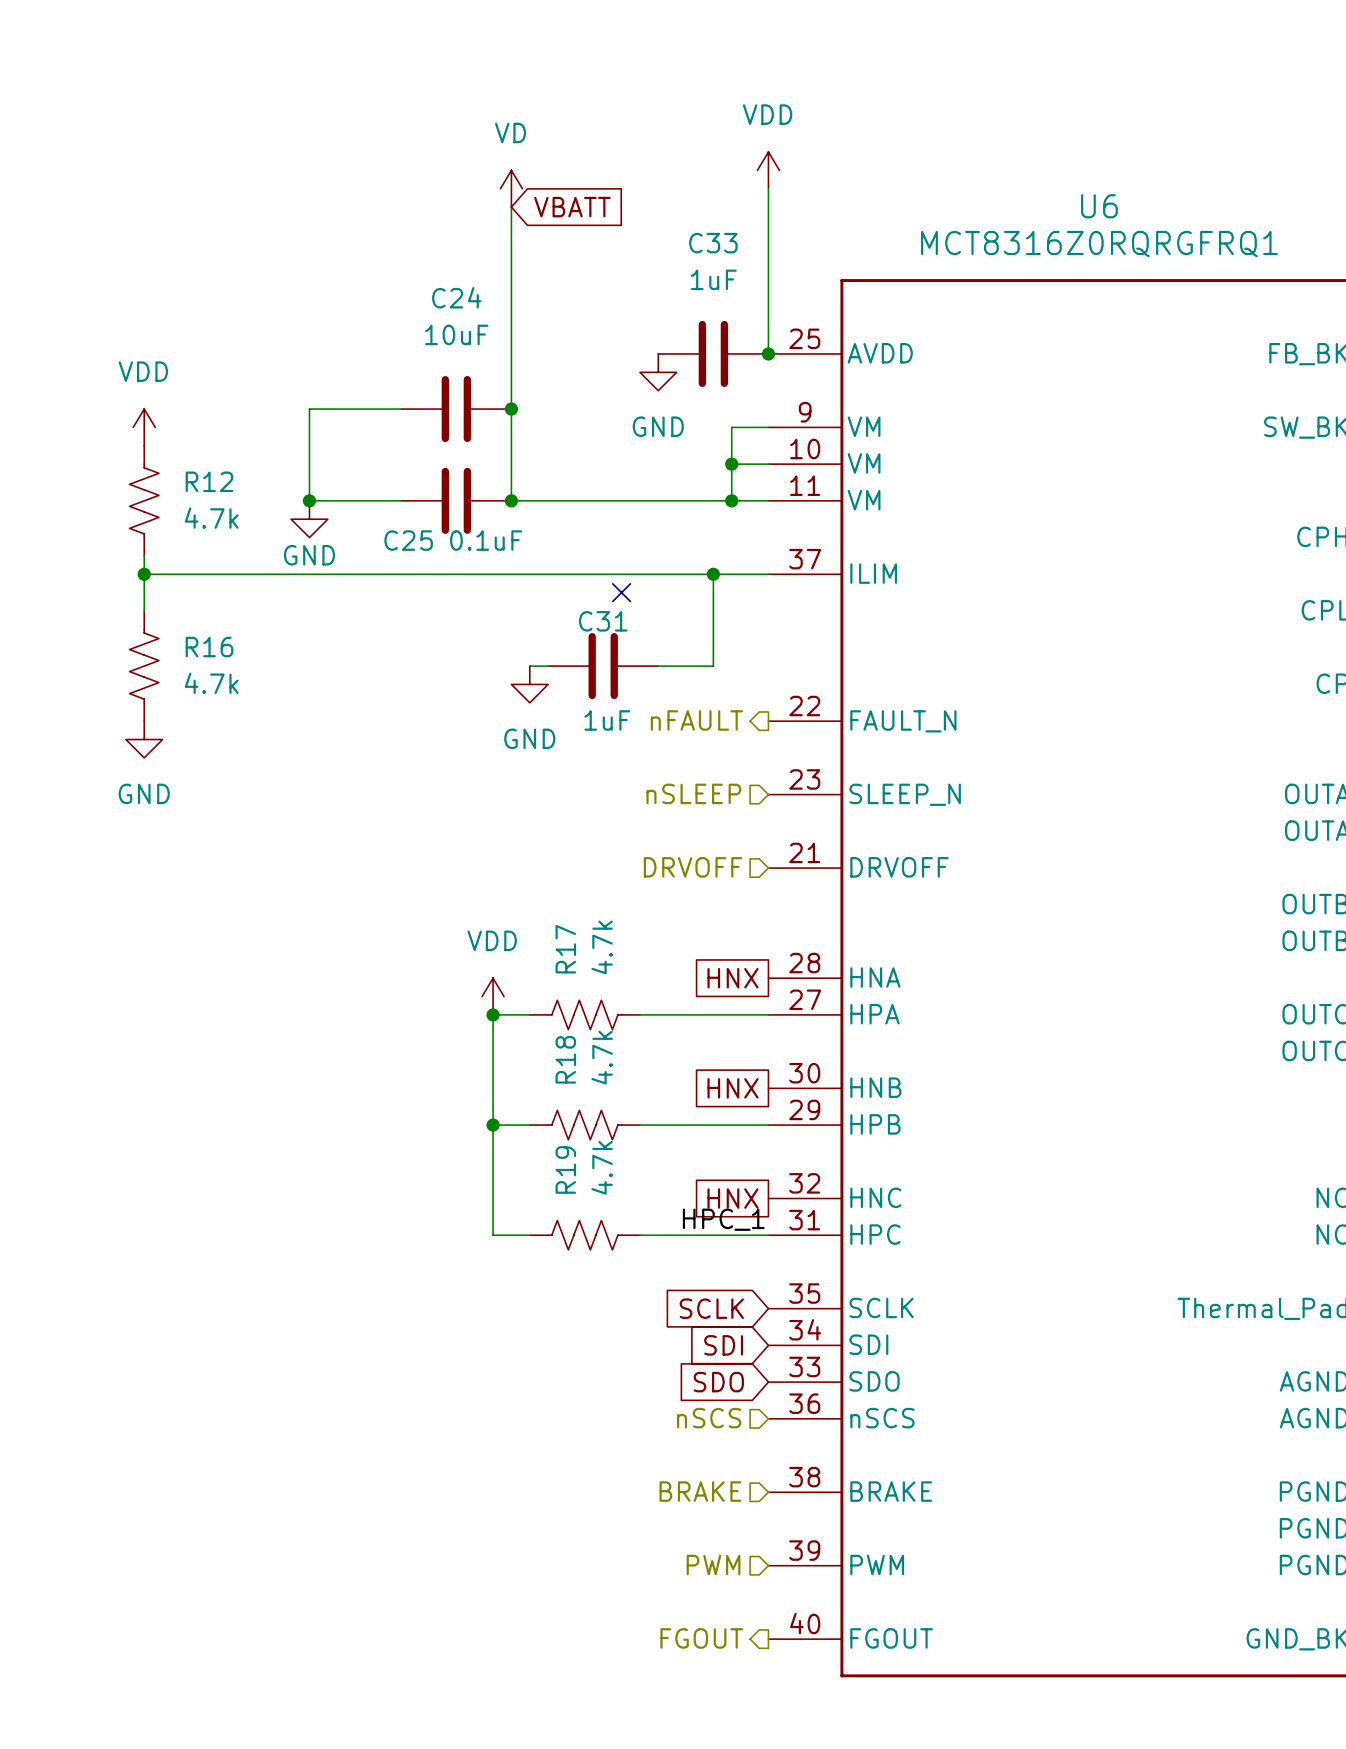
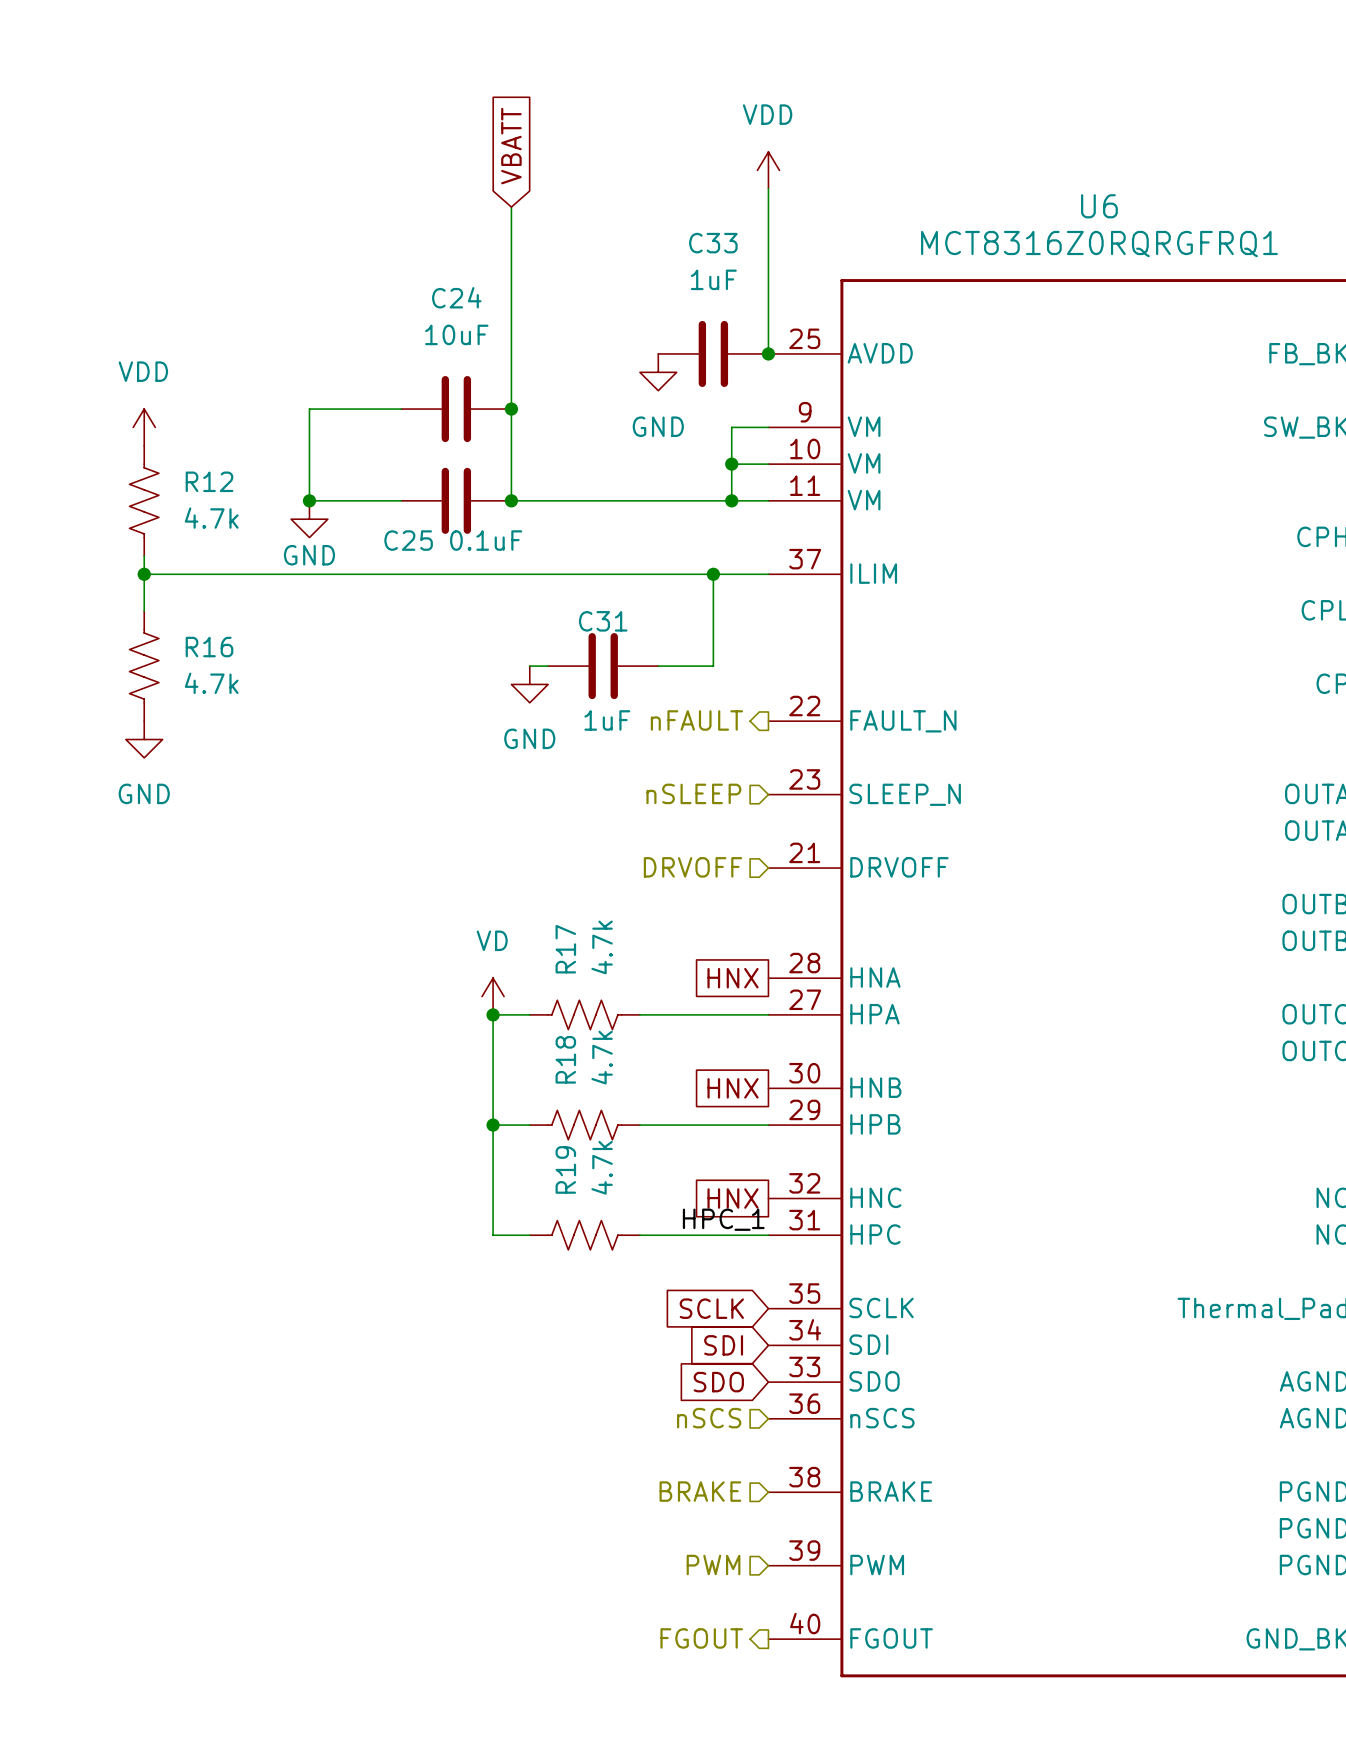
power symbol: VD (511, 188) -> none
global label rotation: 0° (572, 207) -> 90° counterclockwise (511, 146)
no-connect mark: (621, 592) -> none
power symbol: VDD (493, 996) -> VD (493, 996)

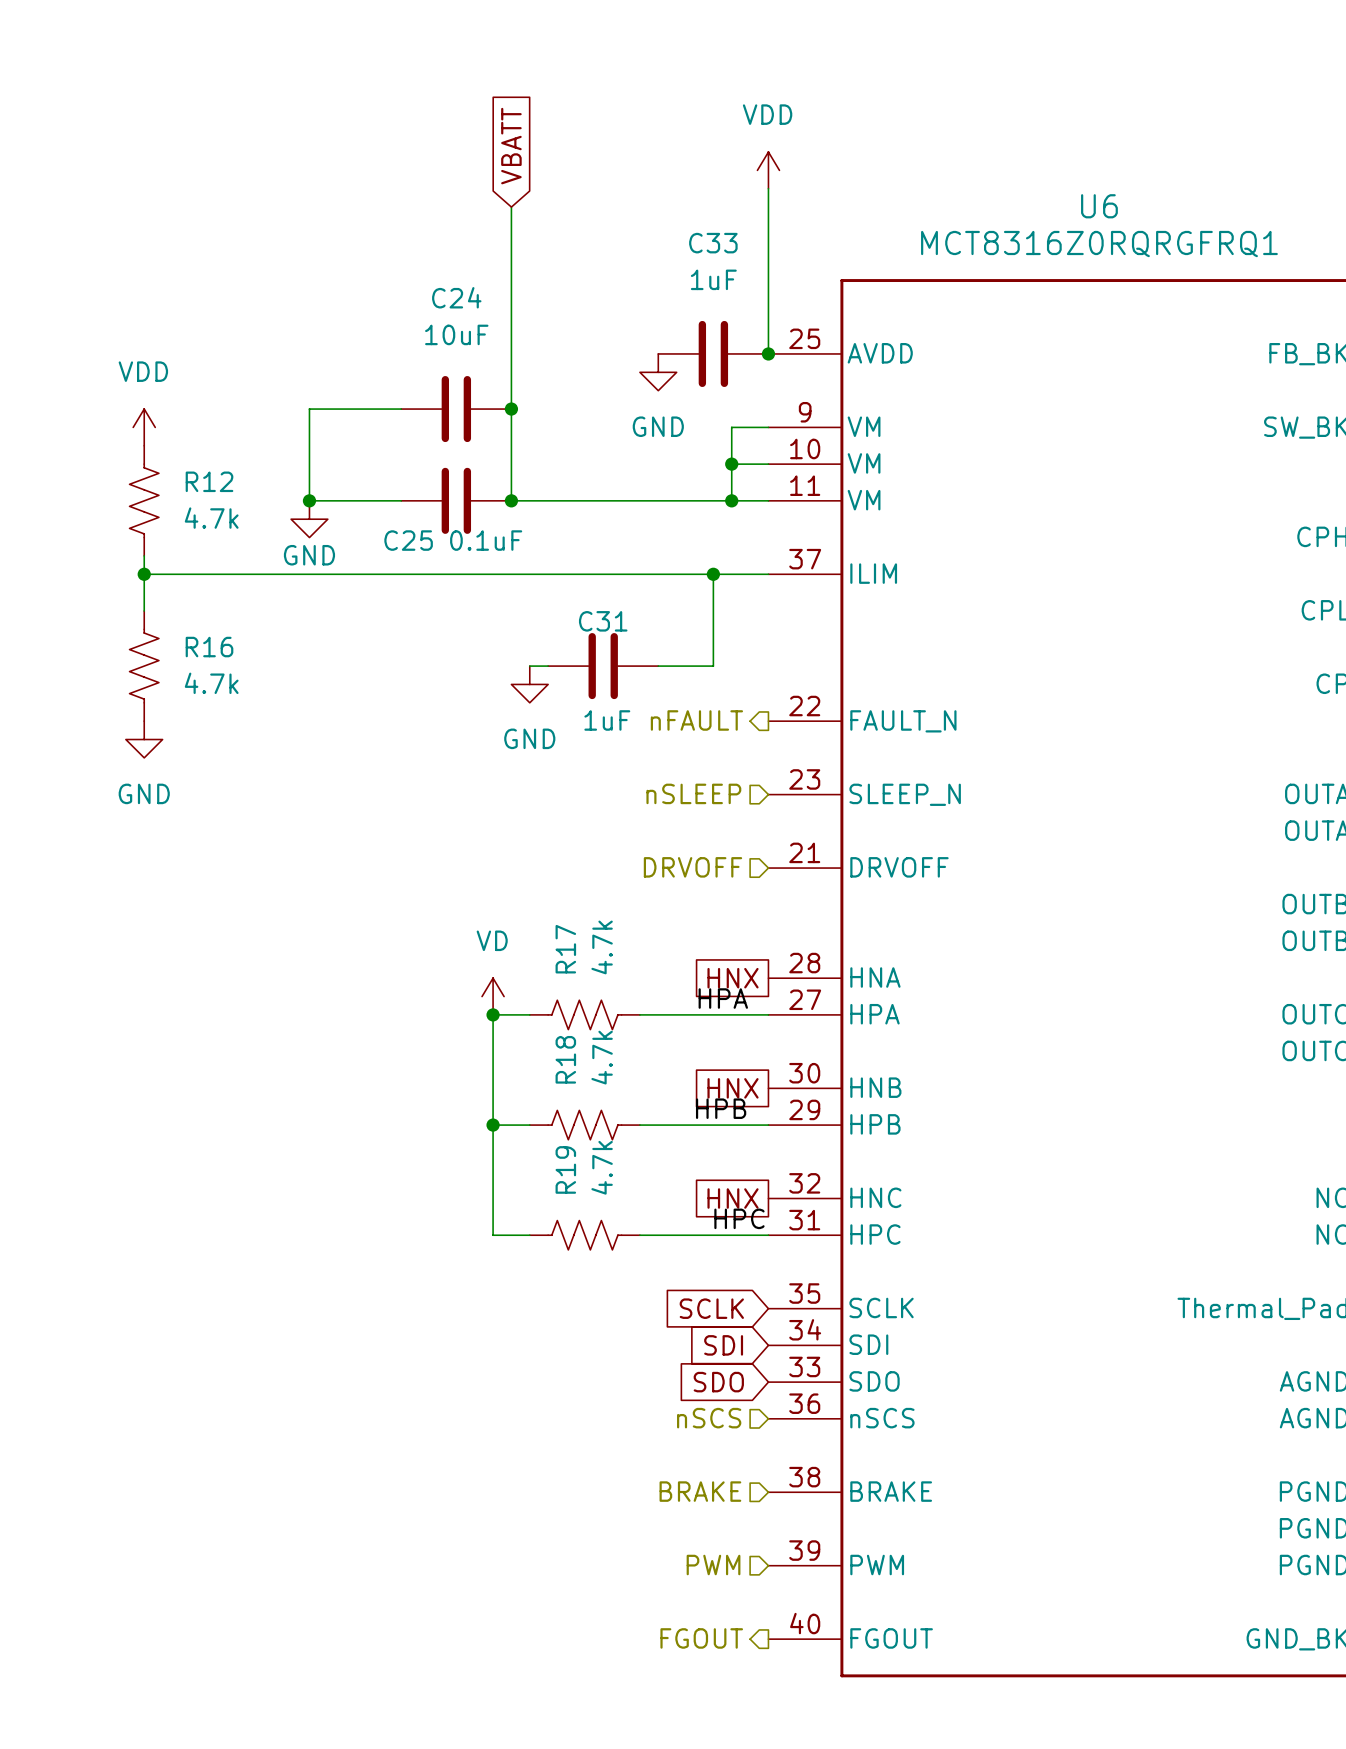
label: none -> HPA (723, 998)
label: none -> HPB (721, 1108)
label: HPC_1 (723, 1219) -> HPC (739, 1218)

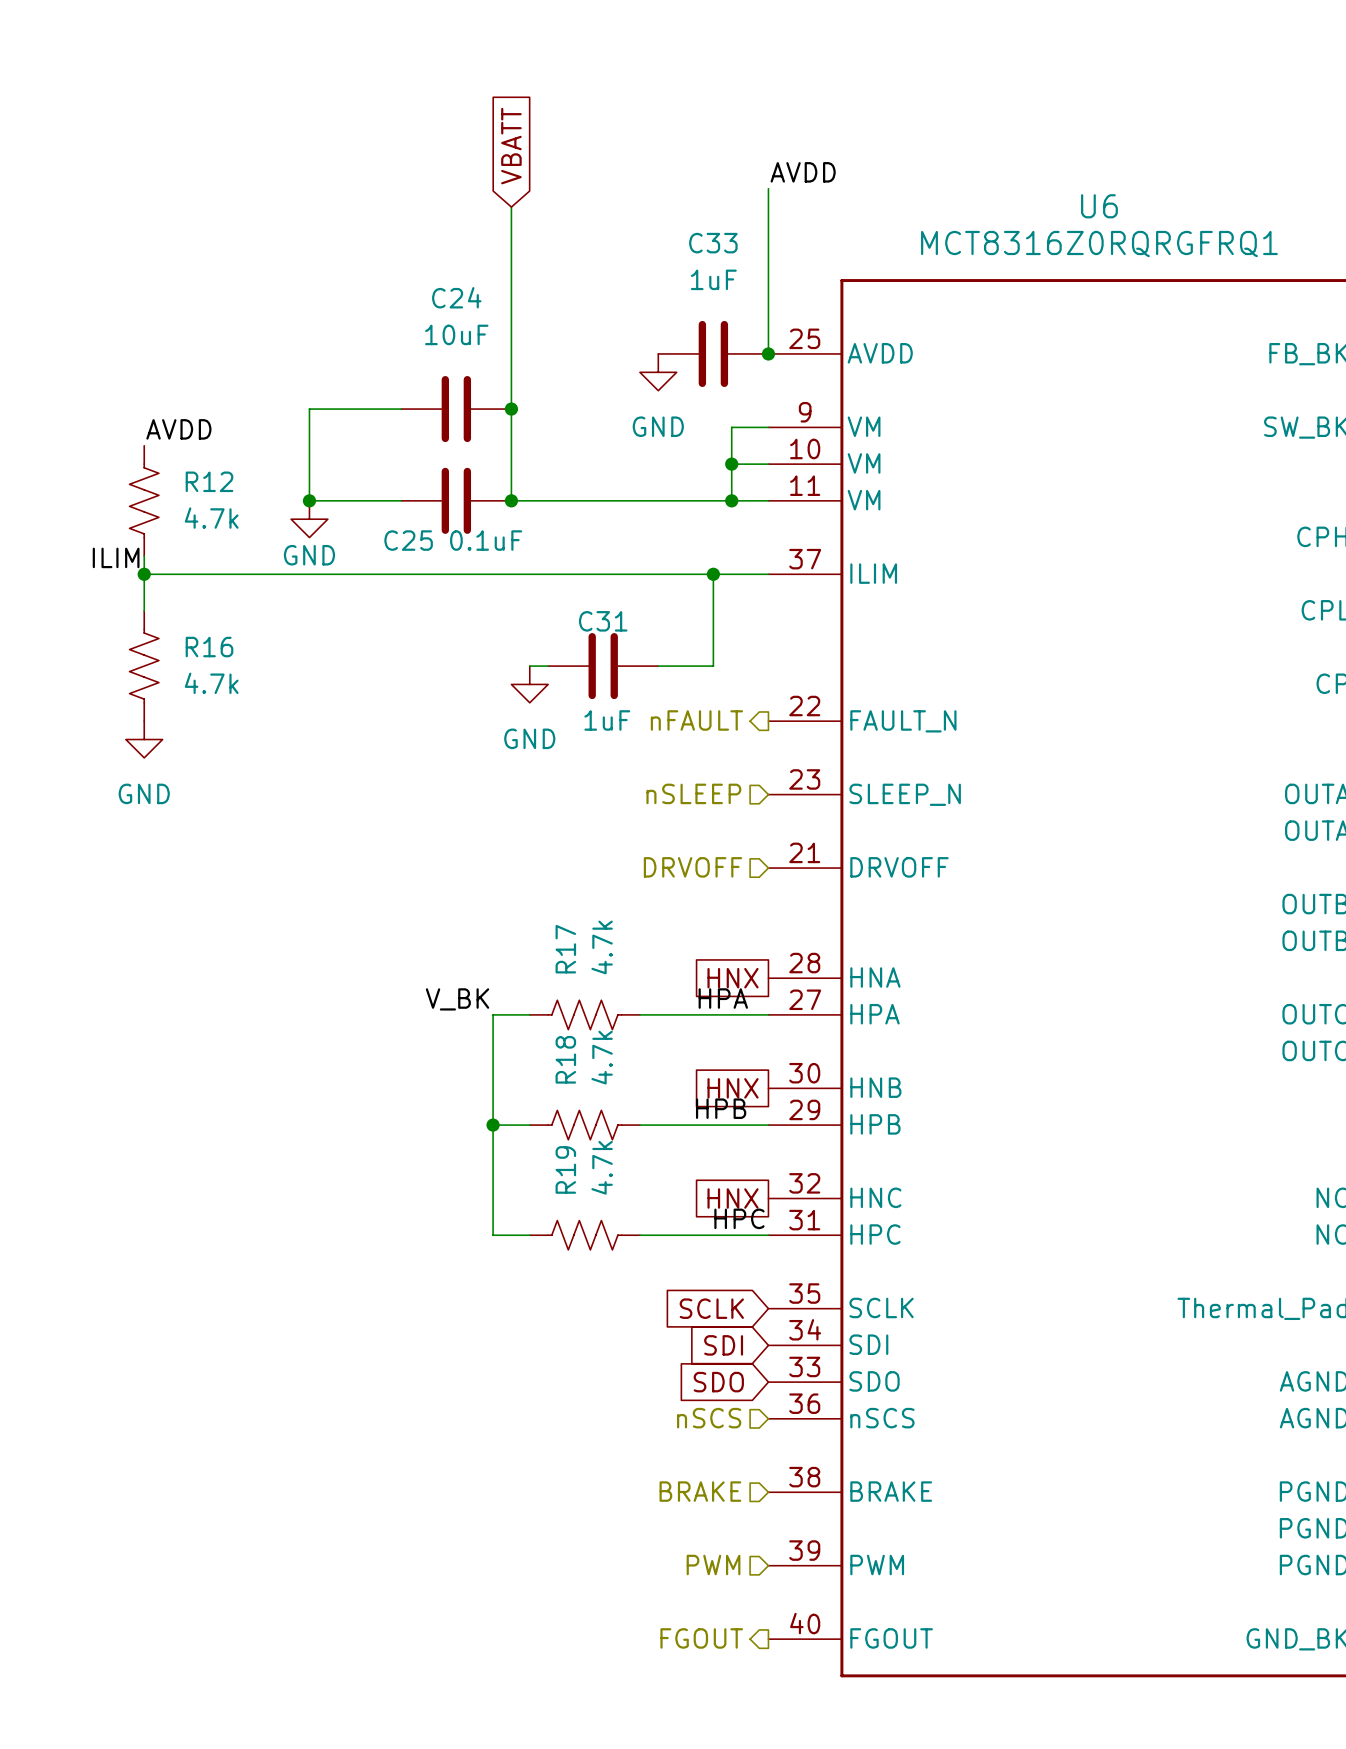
power symbol: VDD (768, 170) -> none
label: none -> AVDD (803, 172)
power symbol: VDD (144, 427) -> none
label: none -> AVDD (178, 429)
label: none -> ILIM (116, 557)
power symbol: VD (493, 996) -> none
label: none -> V_BK (457, 999)
junction: (493, 1014) -> none

